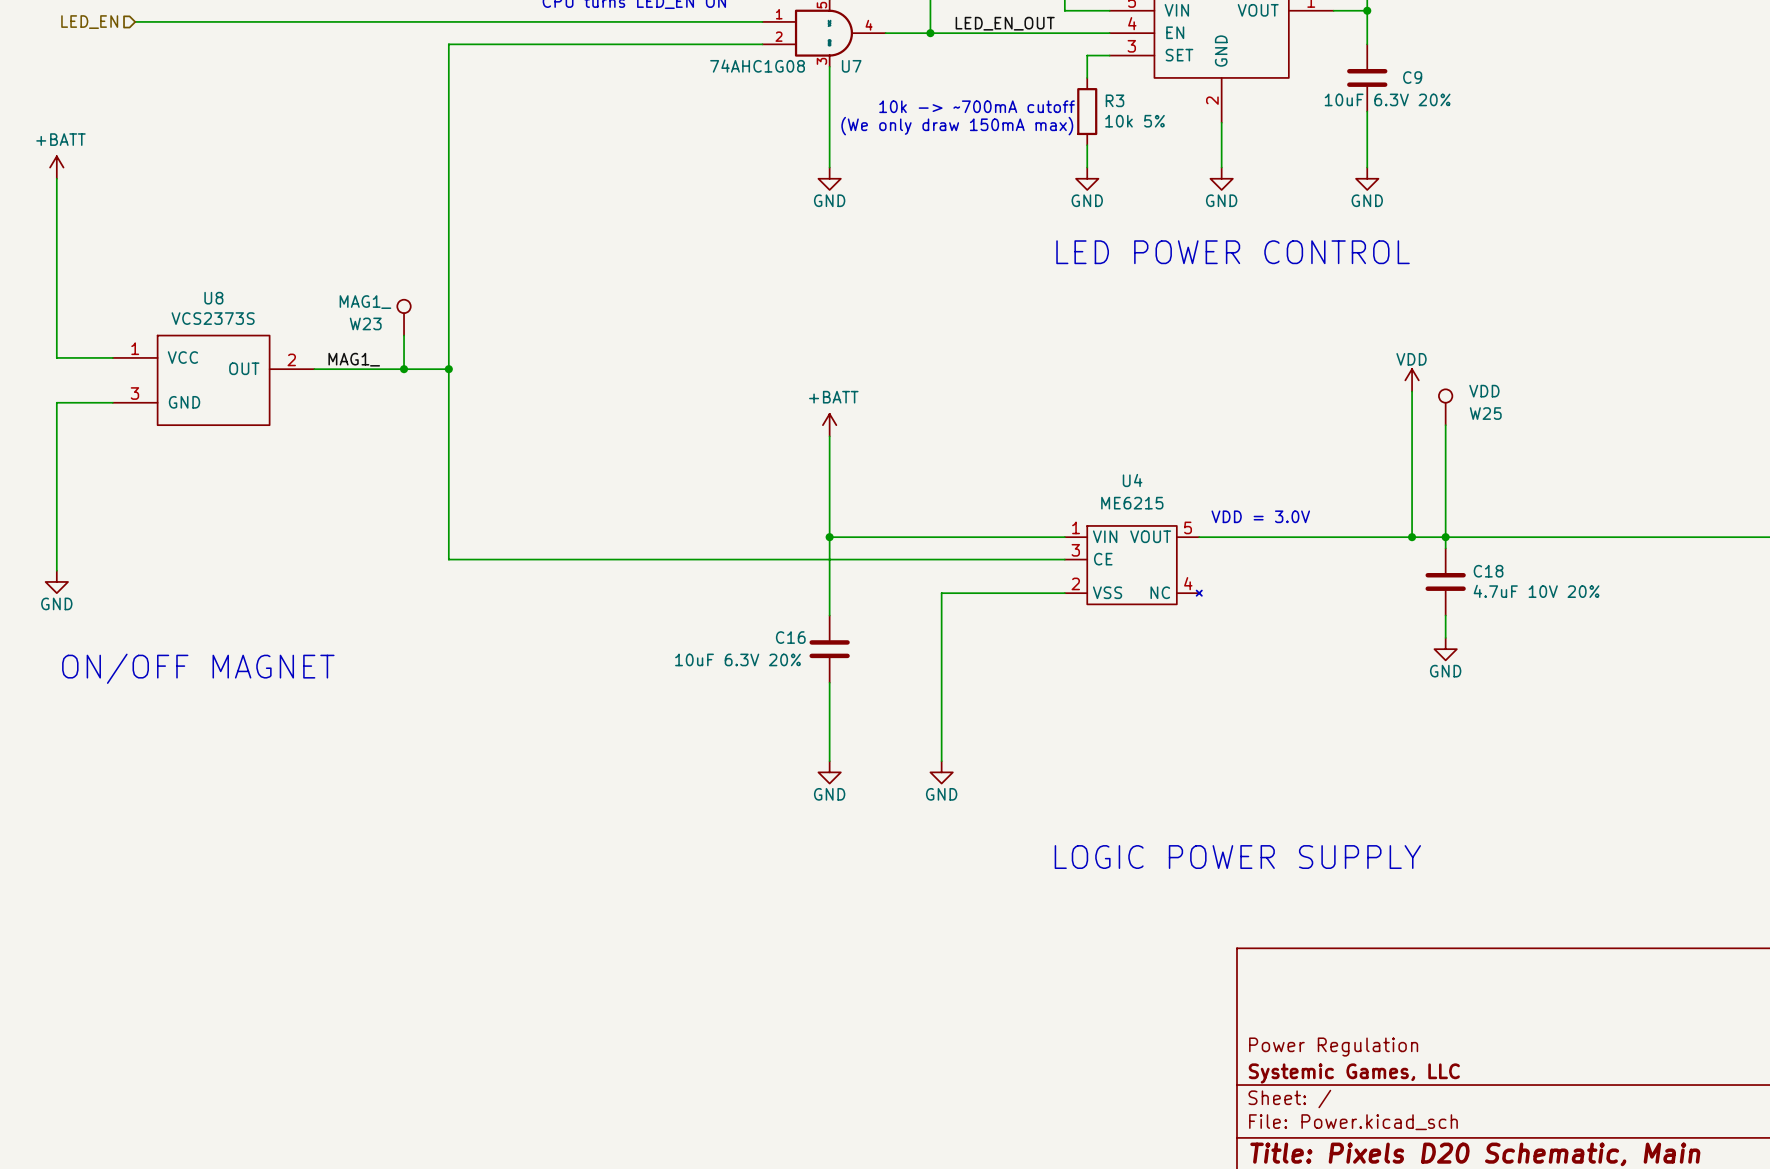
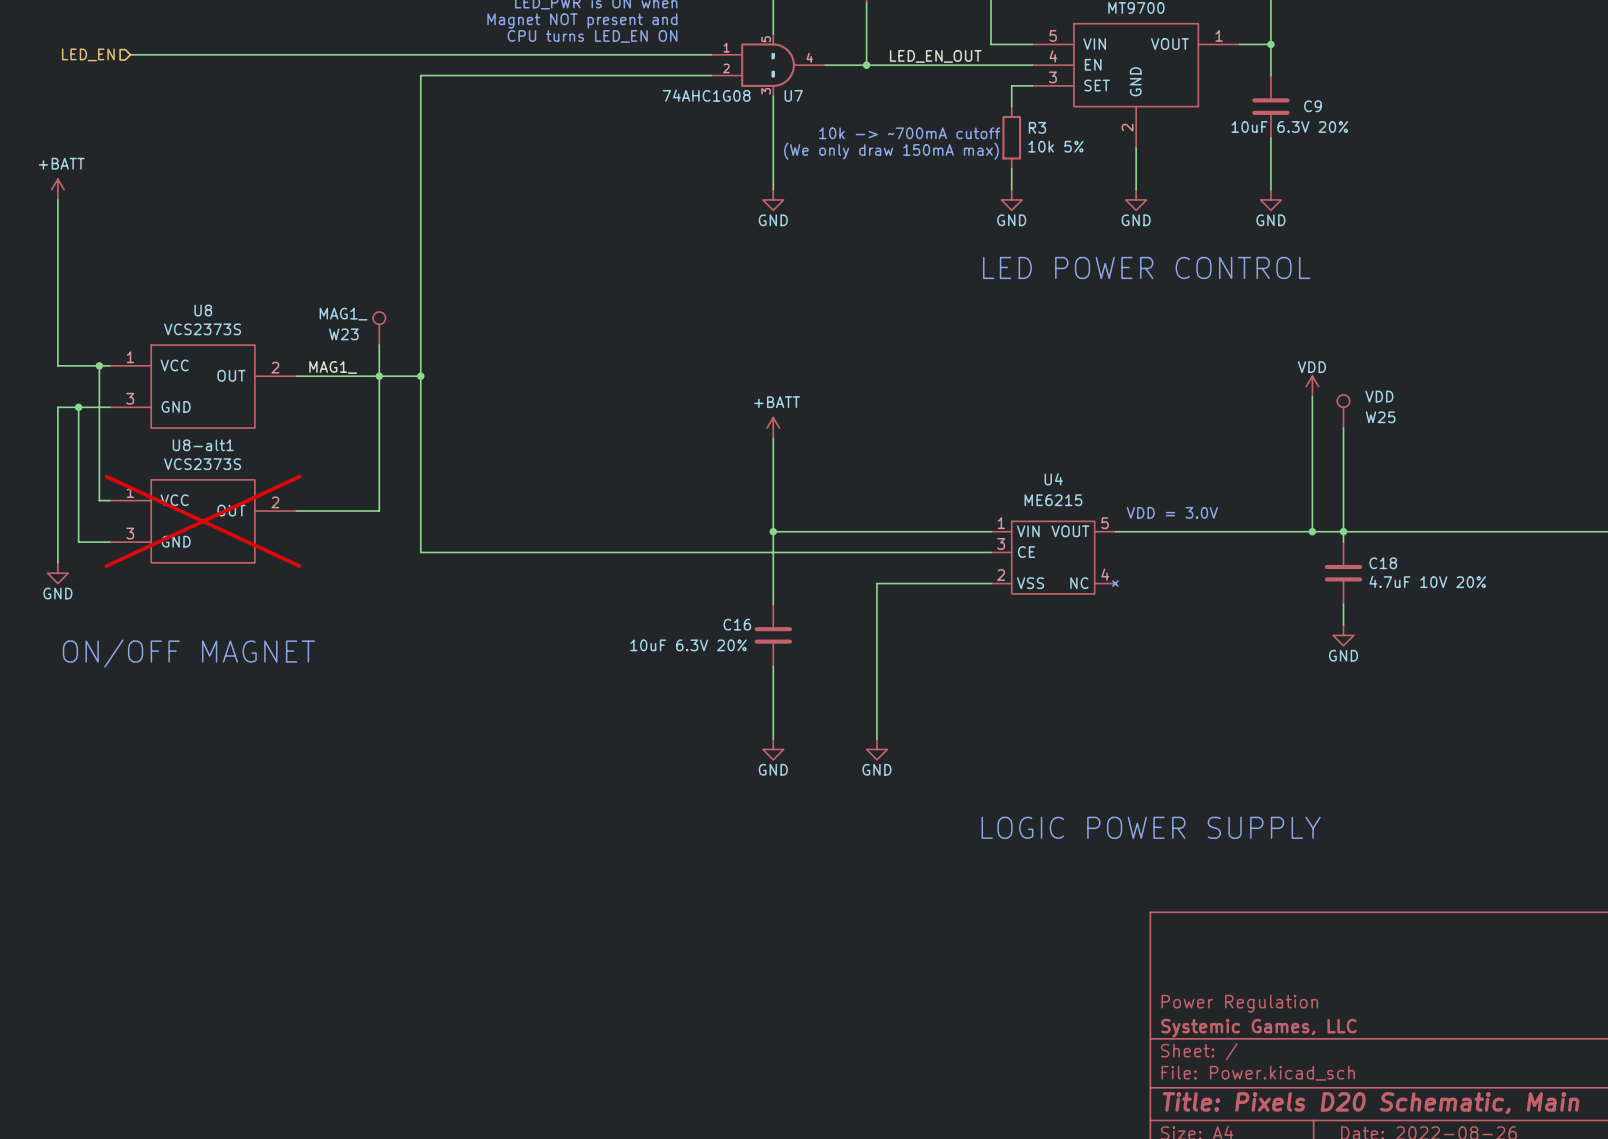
wire: none -> (99, 365) (99, 500) (109, 500)
junction: none -> (99, 365)
wire: none -> (379, 376) (379, 510) (296, 510)
wire: none -> (78, 407) (78, 542) (109, 542)
junction: none -> (78, 407)
U8-alt1: none -> VCS2373S (203, 521)

